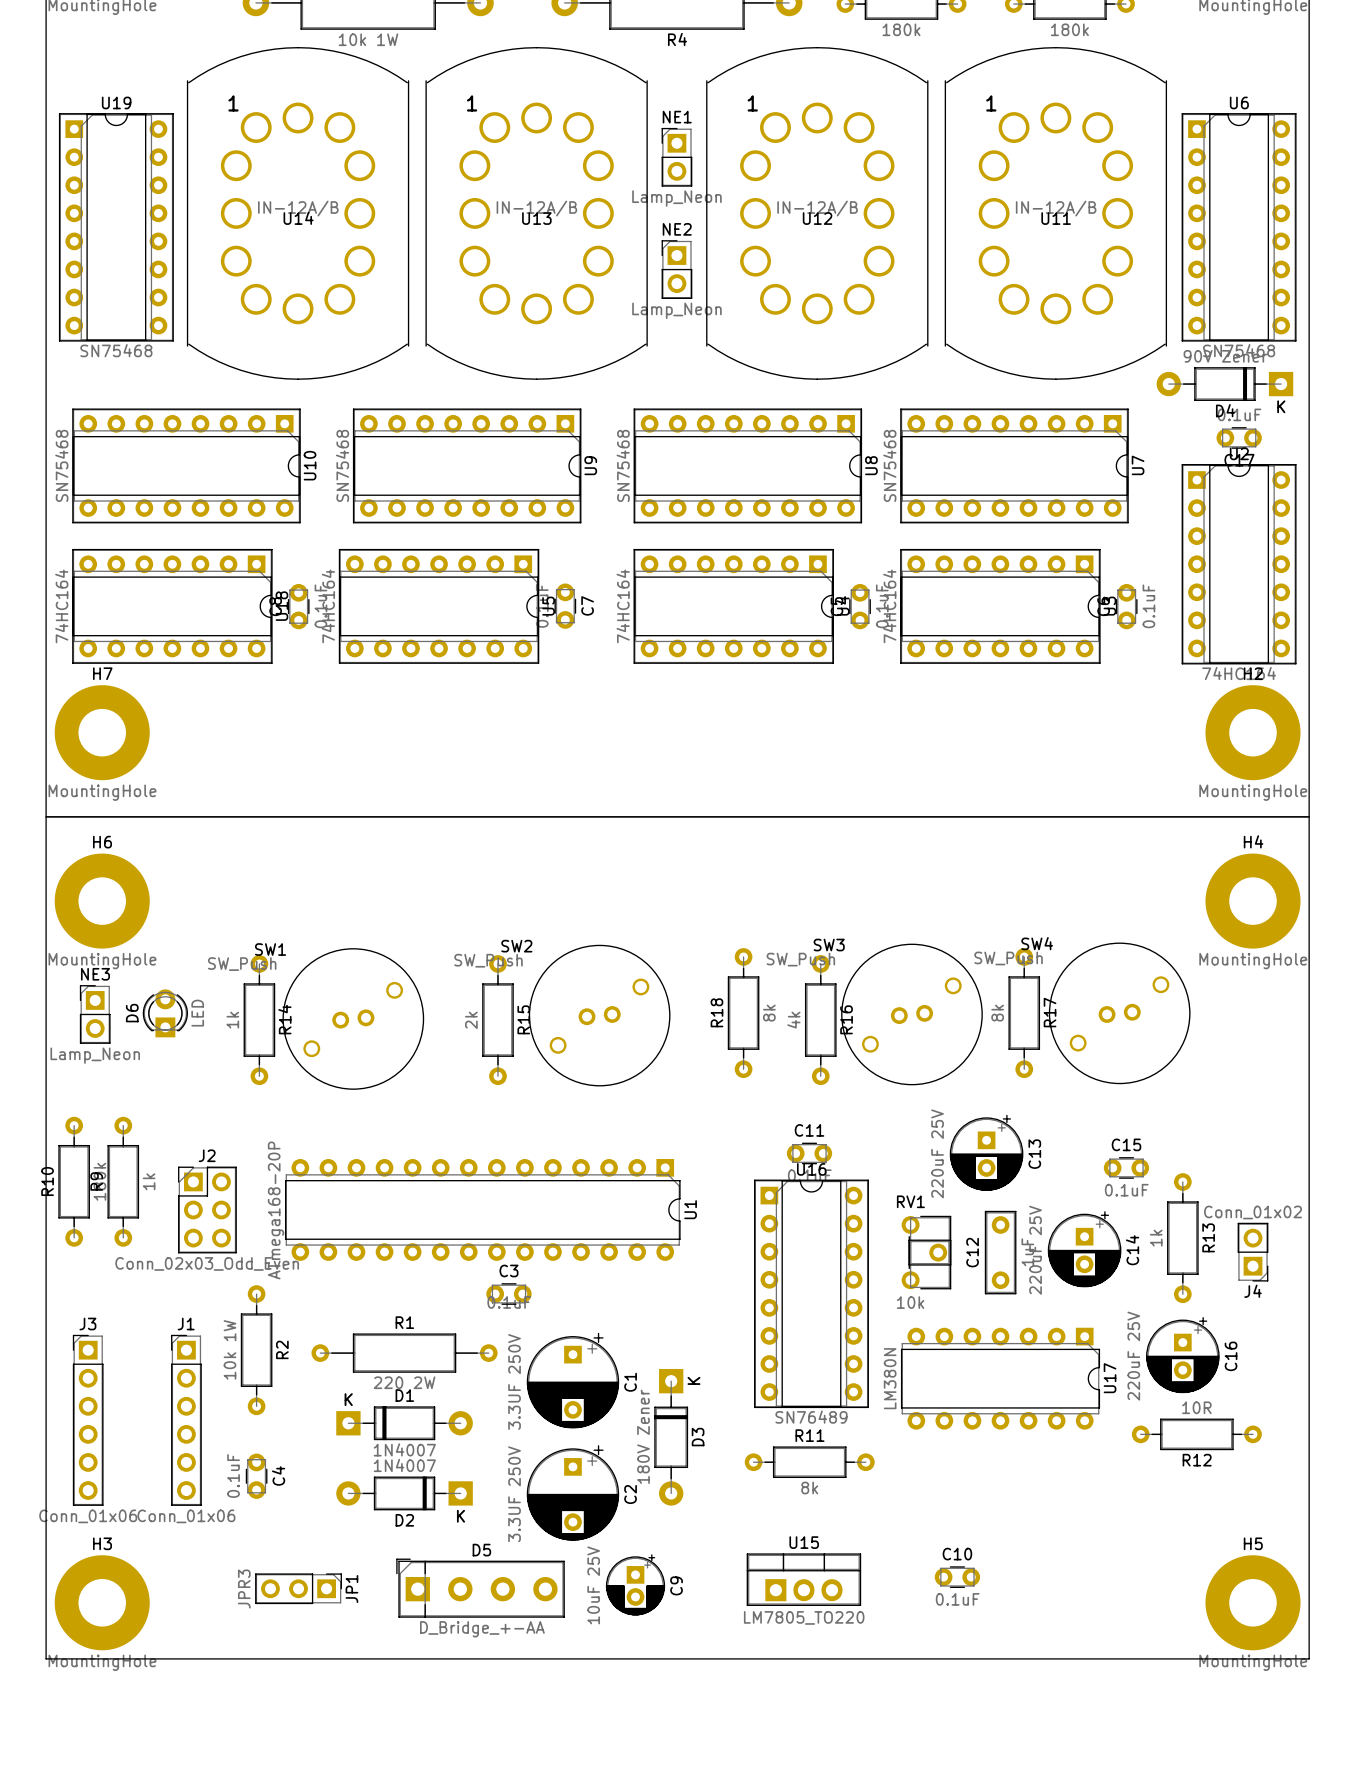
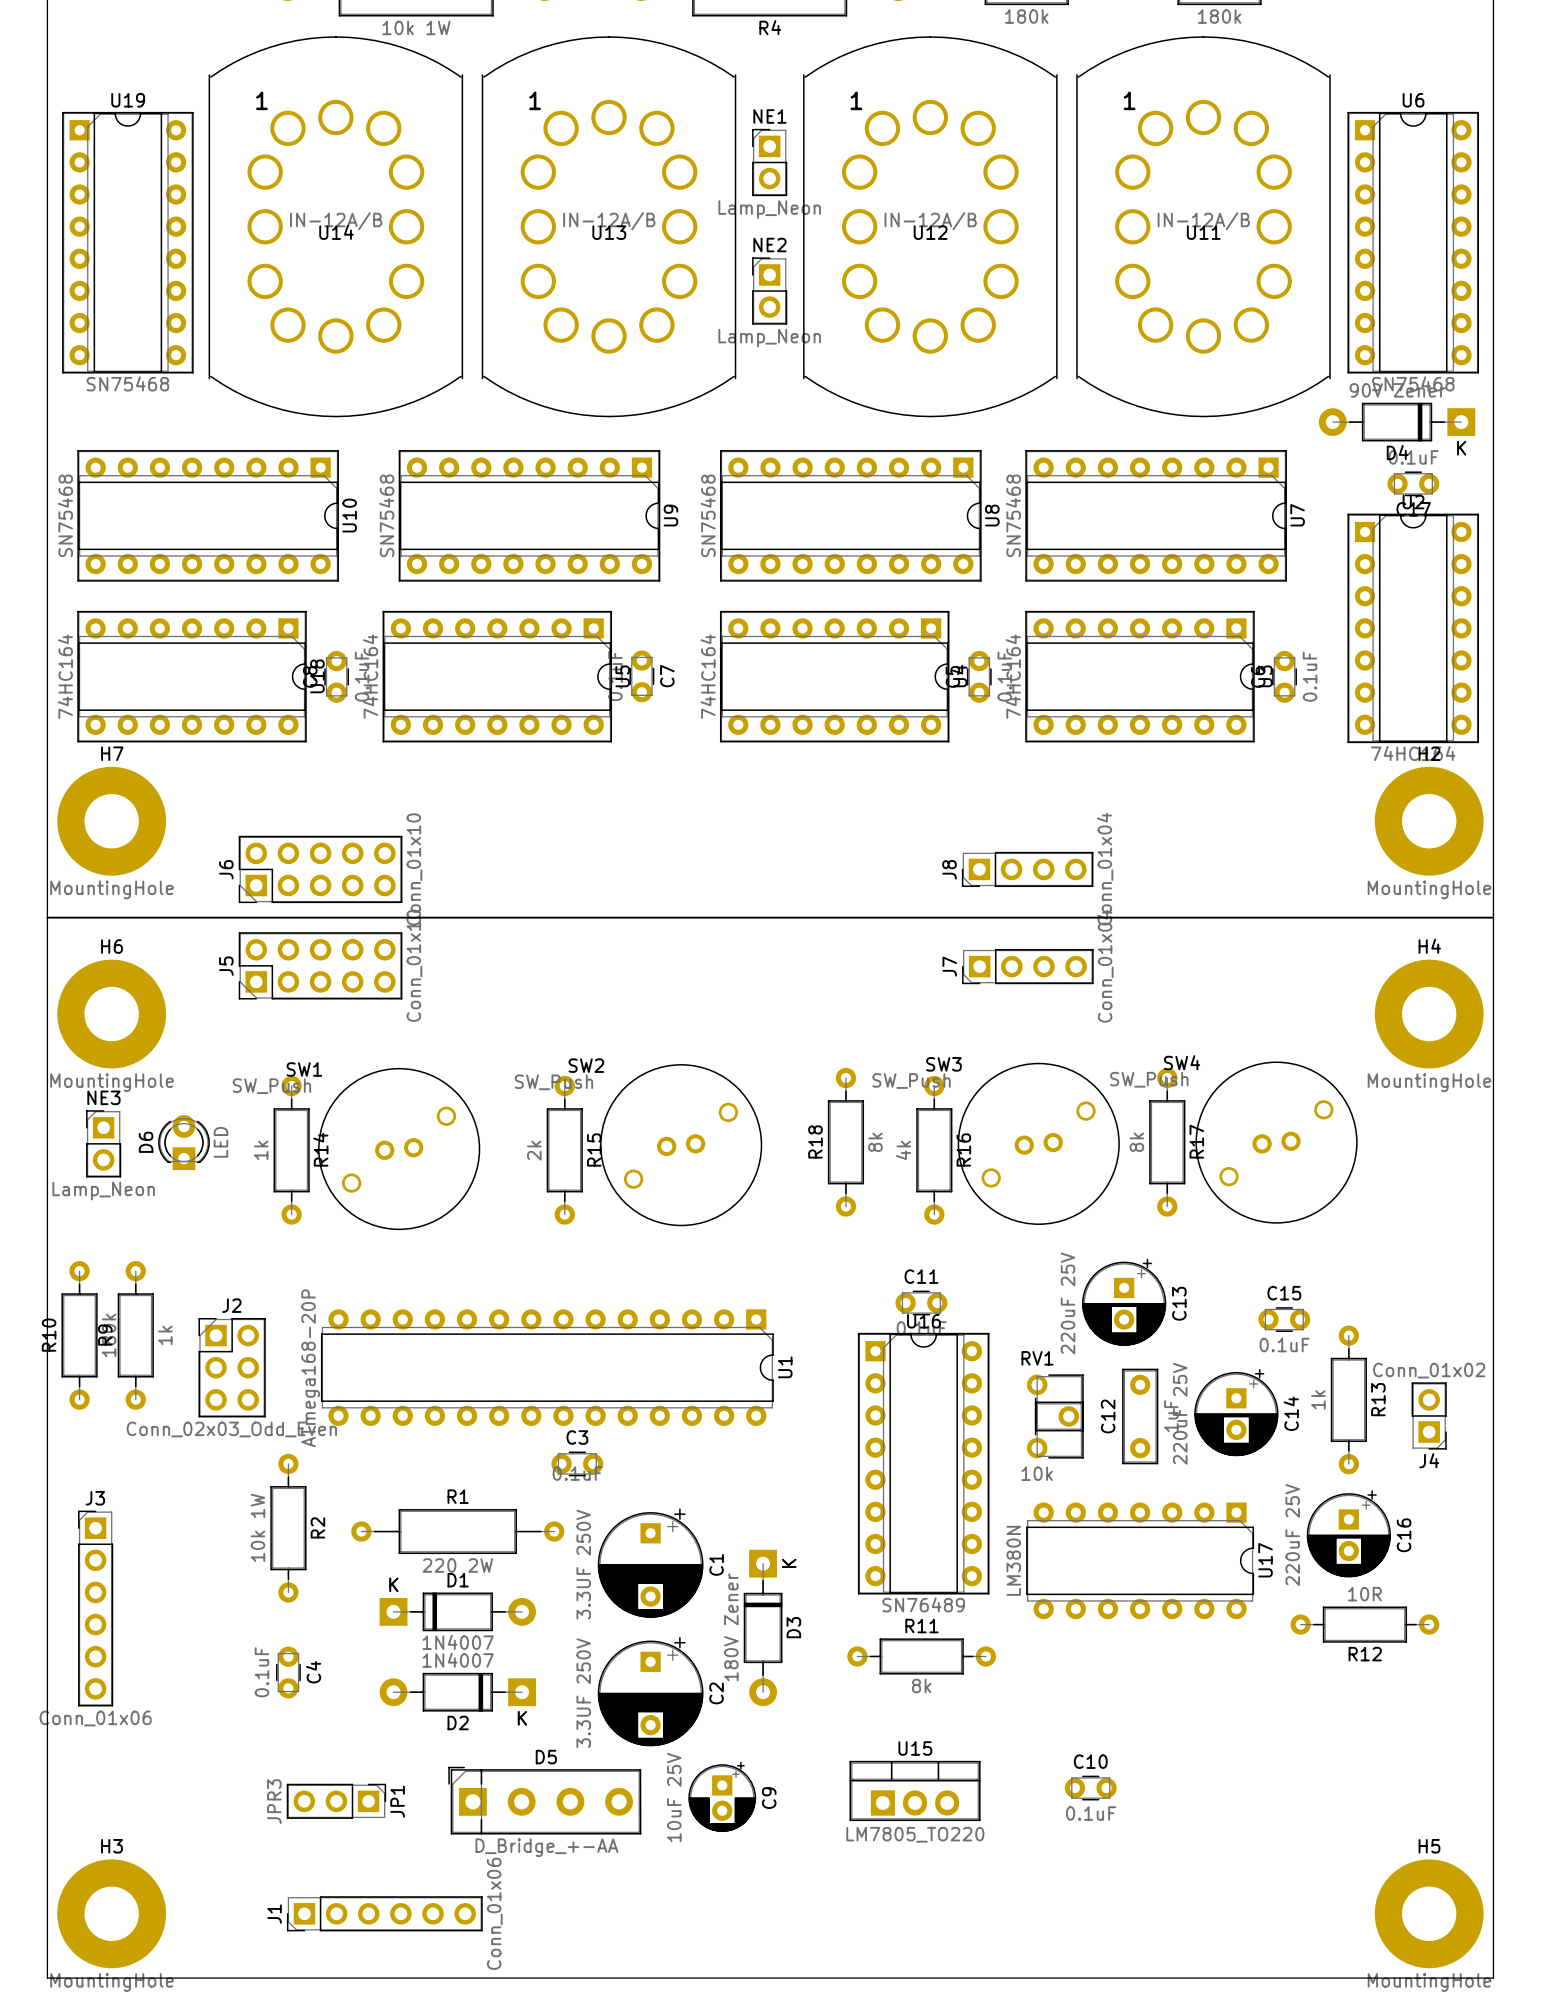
J6: none -> Conn_01x10 (320, 869)
J8: none -> Conn_01x04 (1027, 869)
J5: none -> Conn_01x10 (320, 965)
J7: none -> Conn_01x04 (1027, 966)
J1 rotation: 0° (186, 1420) -> 90° counterclockwise (384, 1913)
J1 position: (186, 1420) -> (384, 1913)
H3 position: (102, 1602) -> (111, 1913)
H5 position: (1253, 1602) -> (1429, 1913)
board edge: (46, 1658) (1309, 1658) -> (47, 1881) (47, 1978) (1493, 1978) (1493, 1881)

